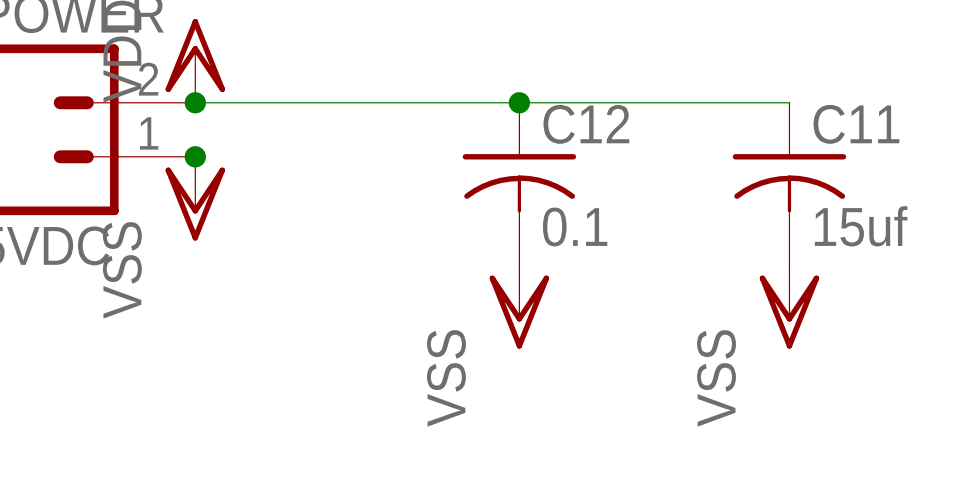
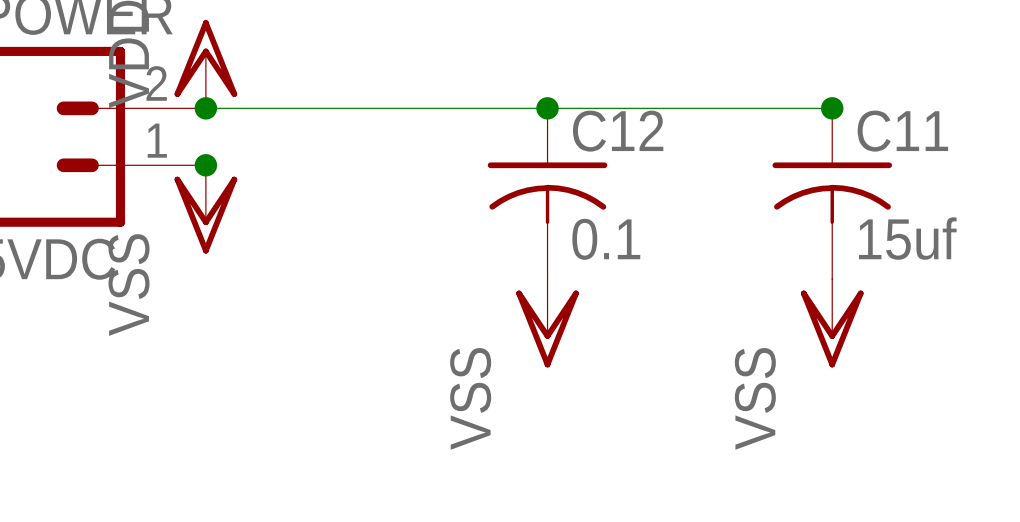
junction: none -> (832, 108)

